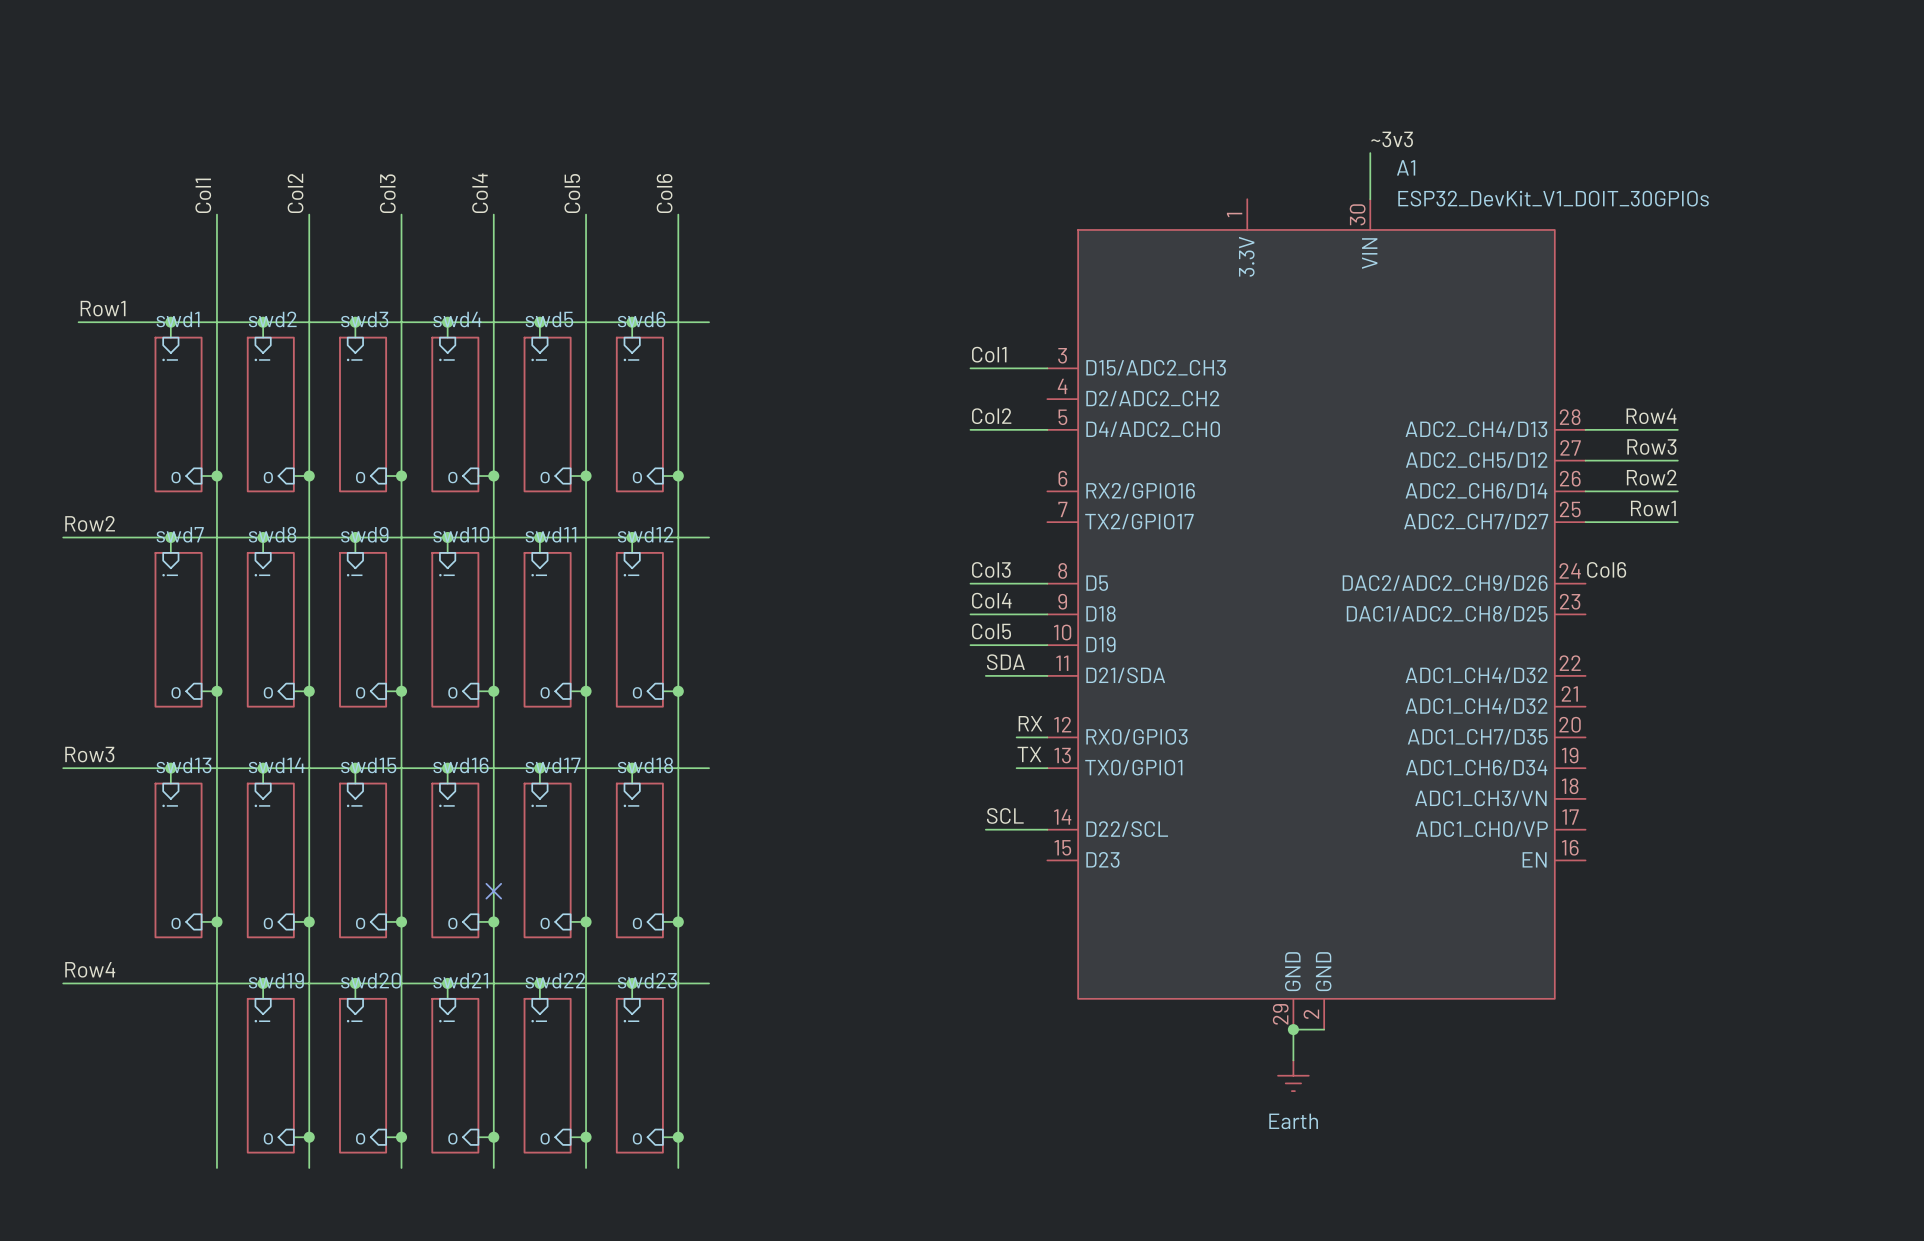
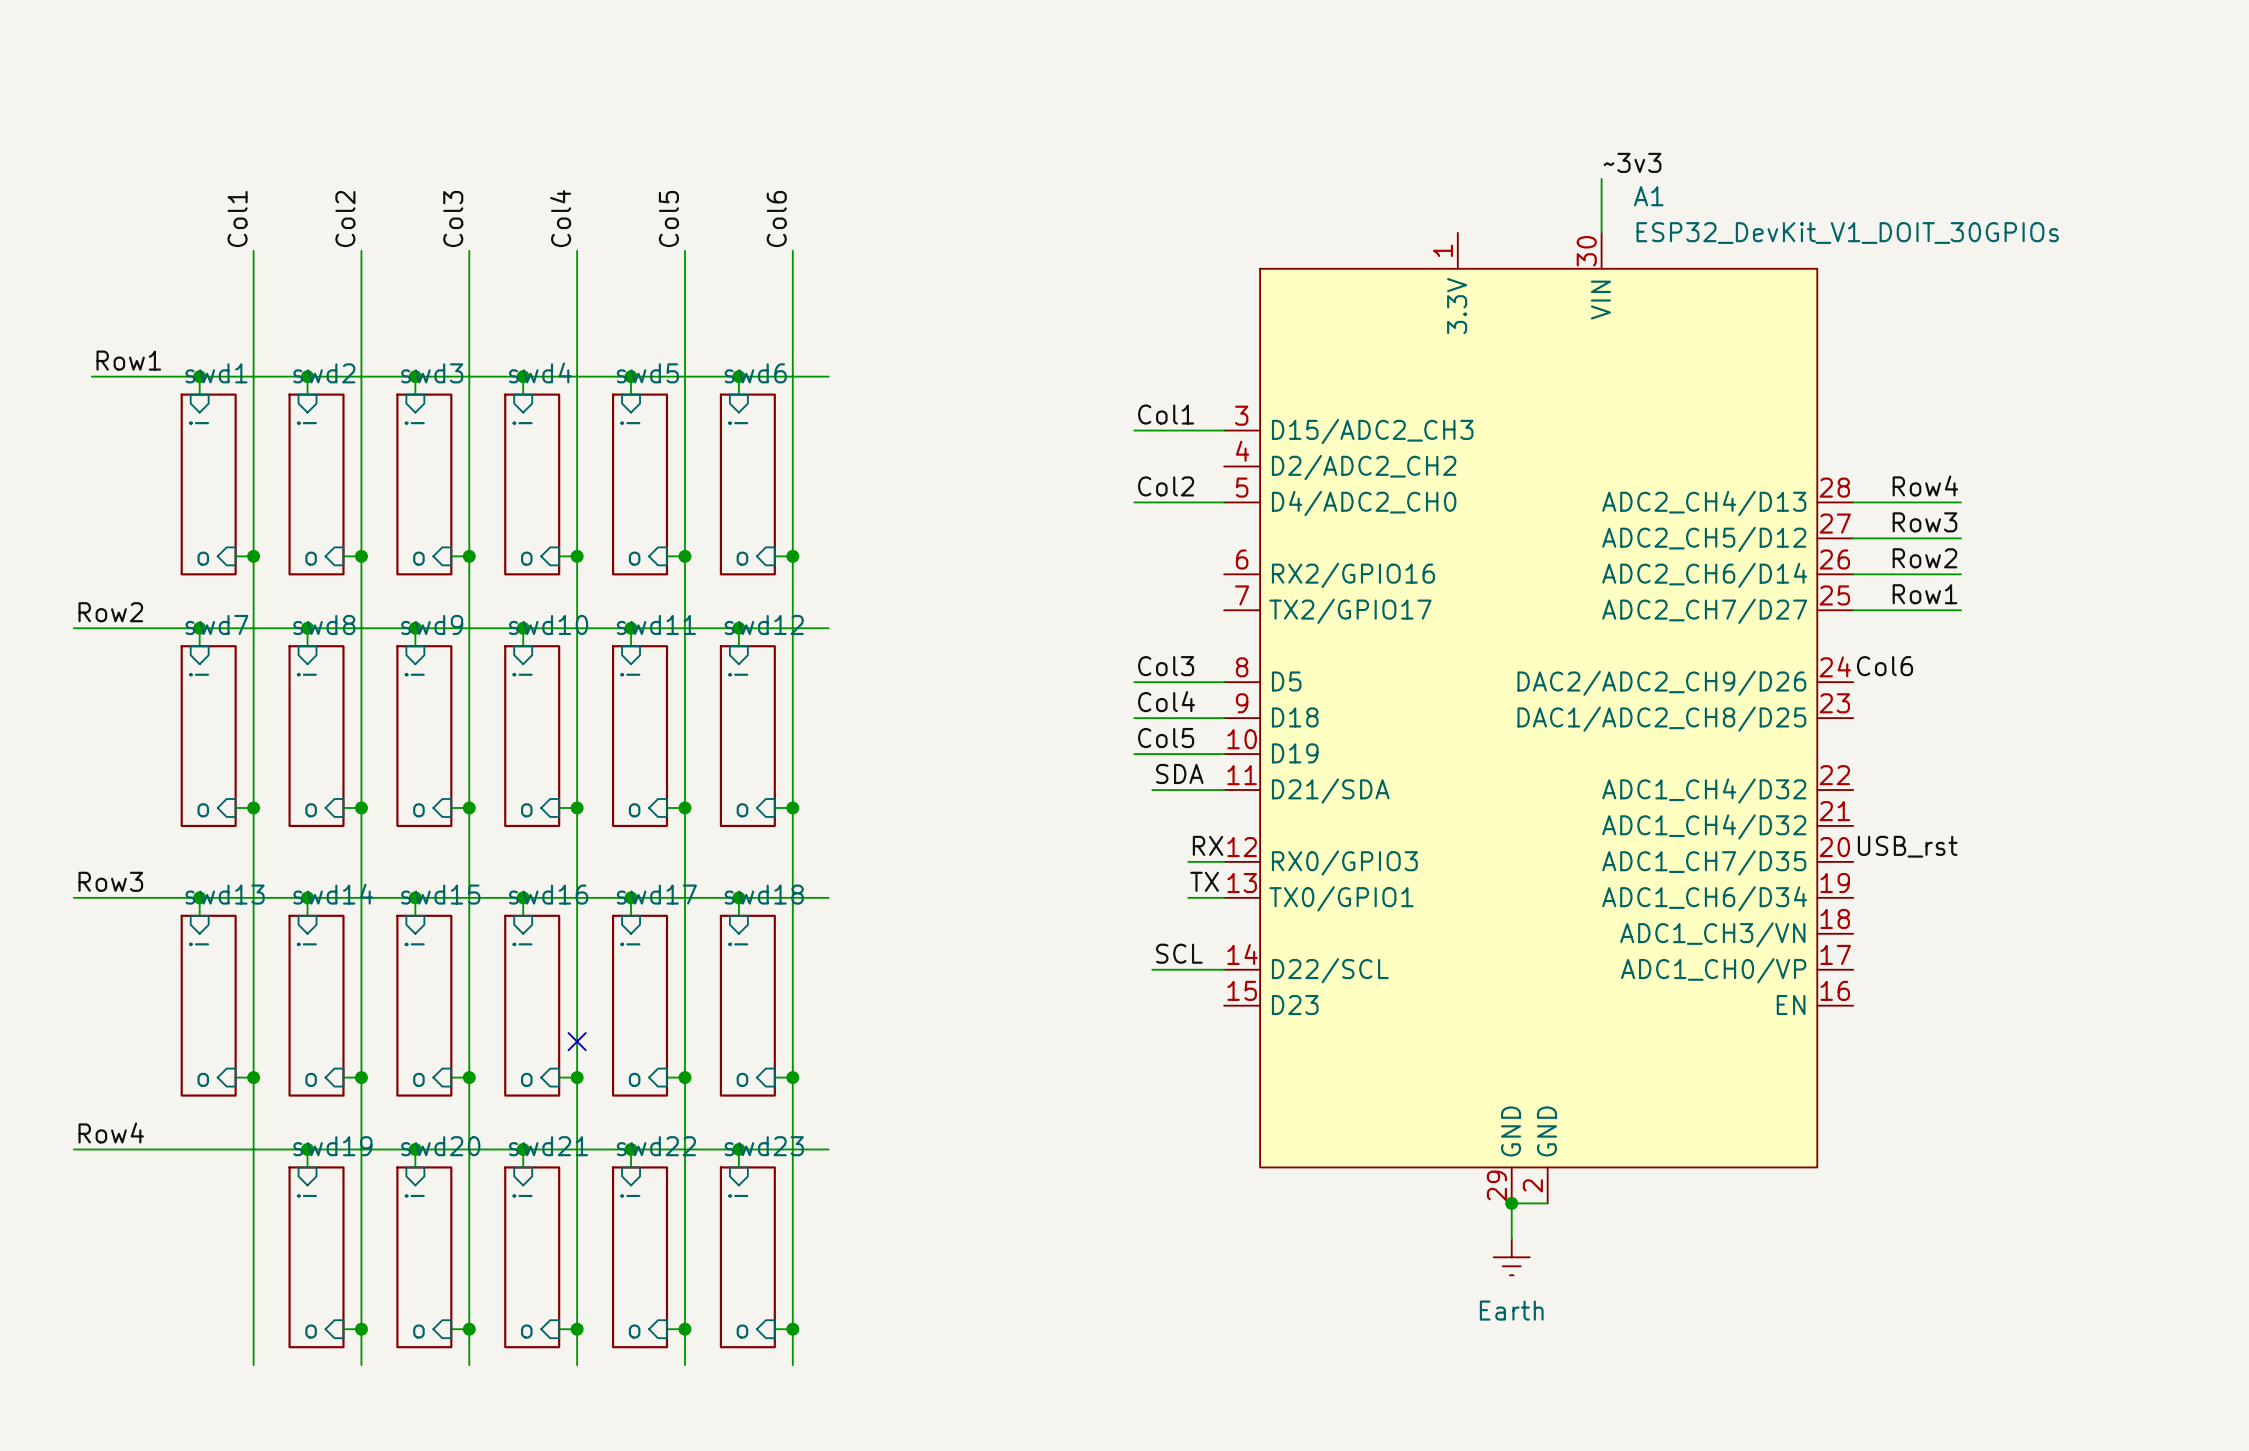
label: none -> USB_rst (1907, 846)

